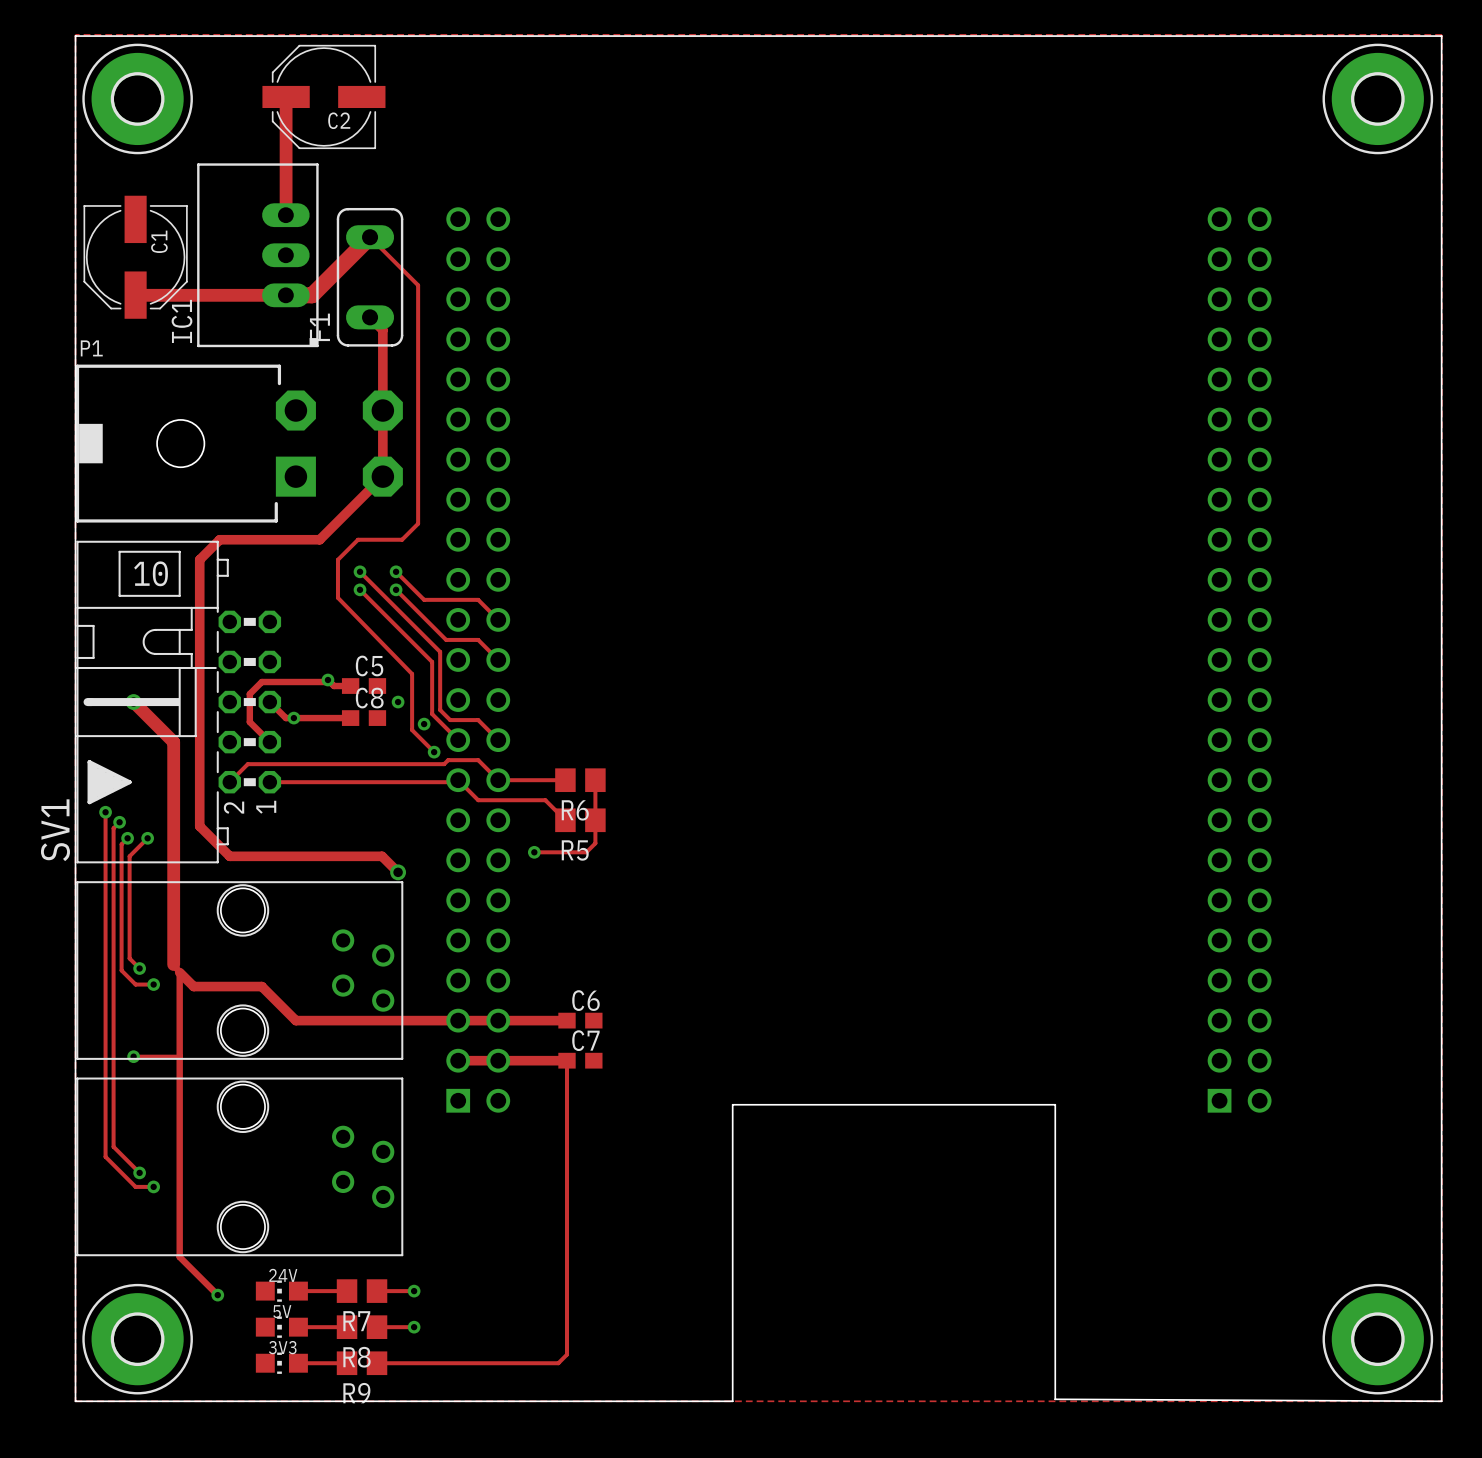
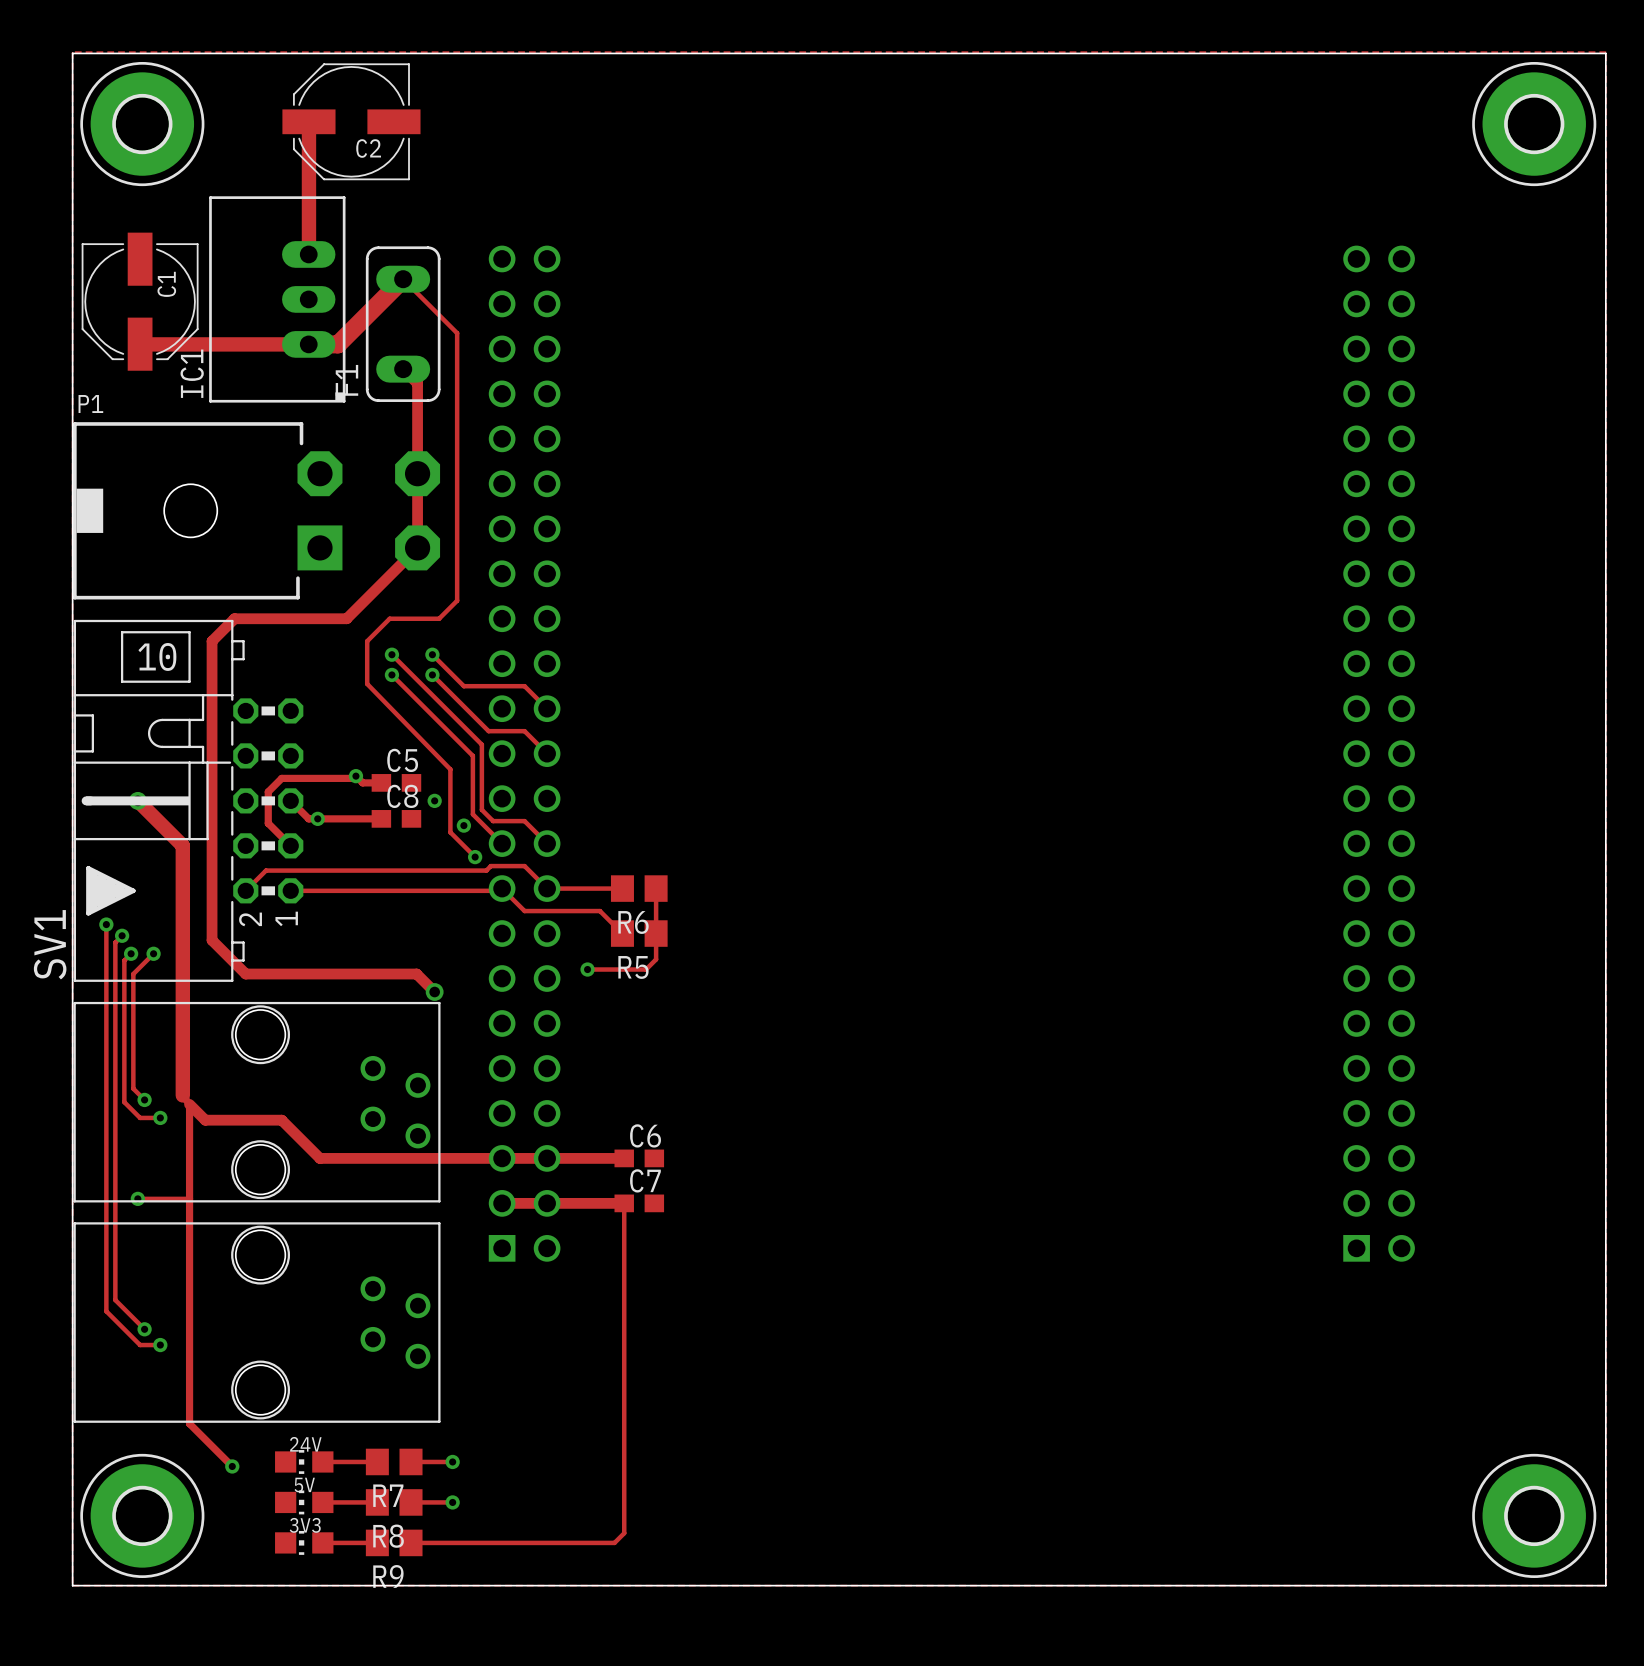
board edge: (732, 1401) (732, 1104) (1055, 1104) (1055, 1399) (1441, 1401) -> (810, 1585) (1605, 1585)

